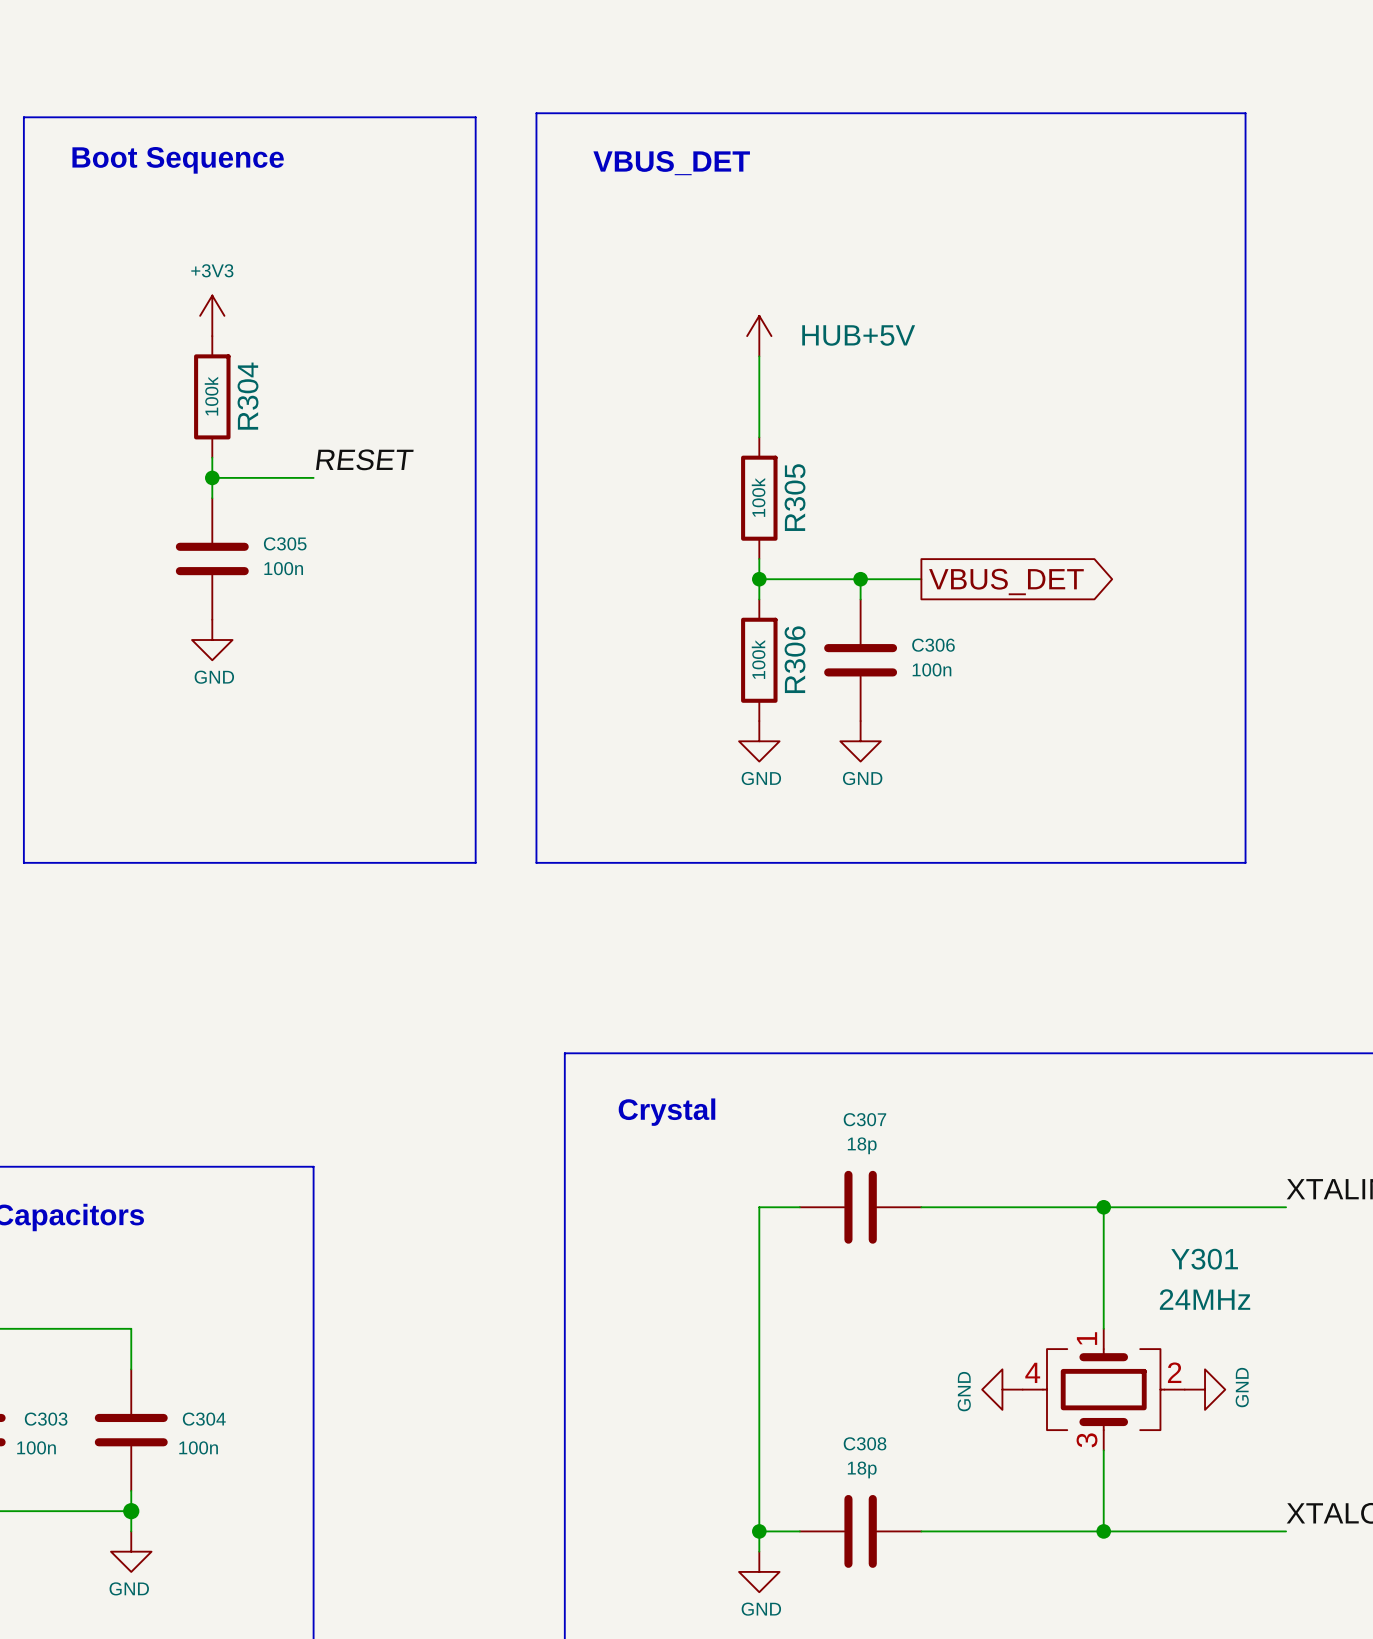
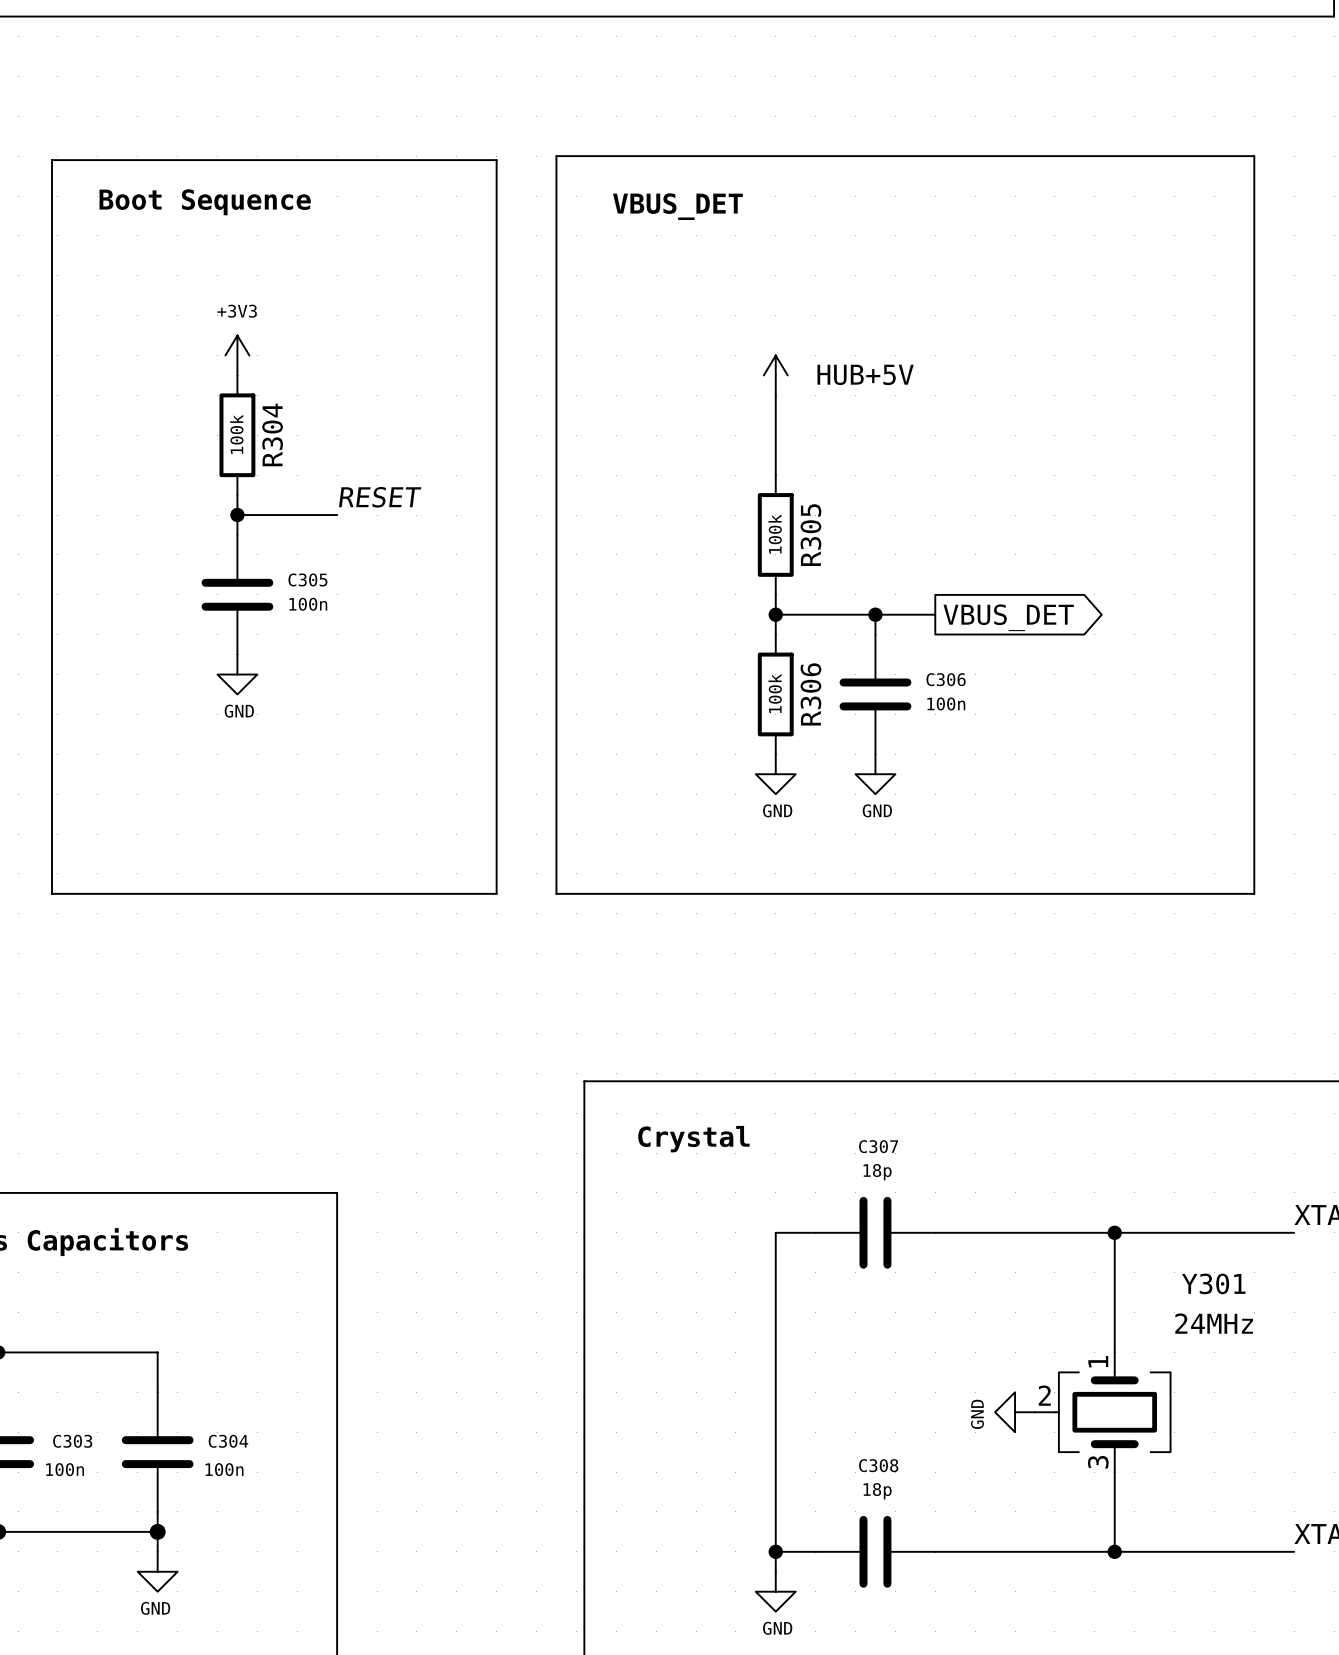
Y301 symbol: [1022, 1328, 1185, 1451] -> [1034, 1352, 1171, 1473]
power symbol: GND (1205, 1389) -> none

